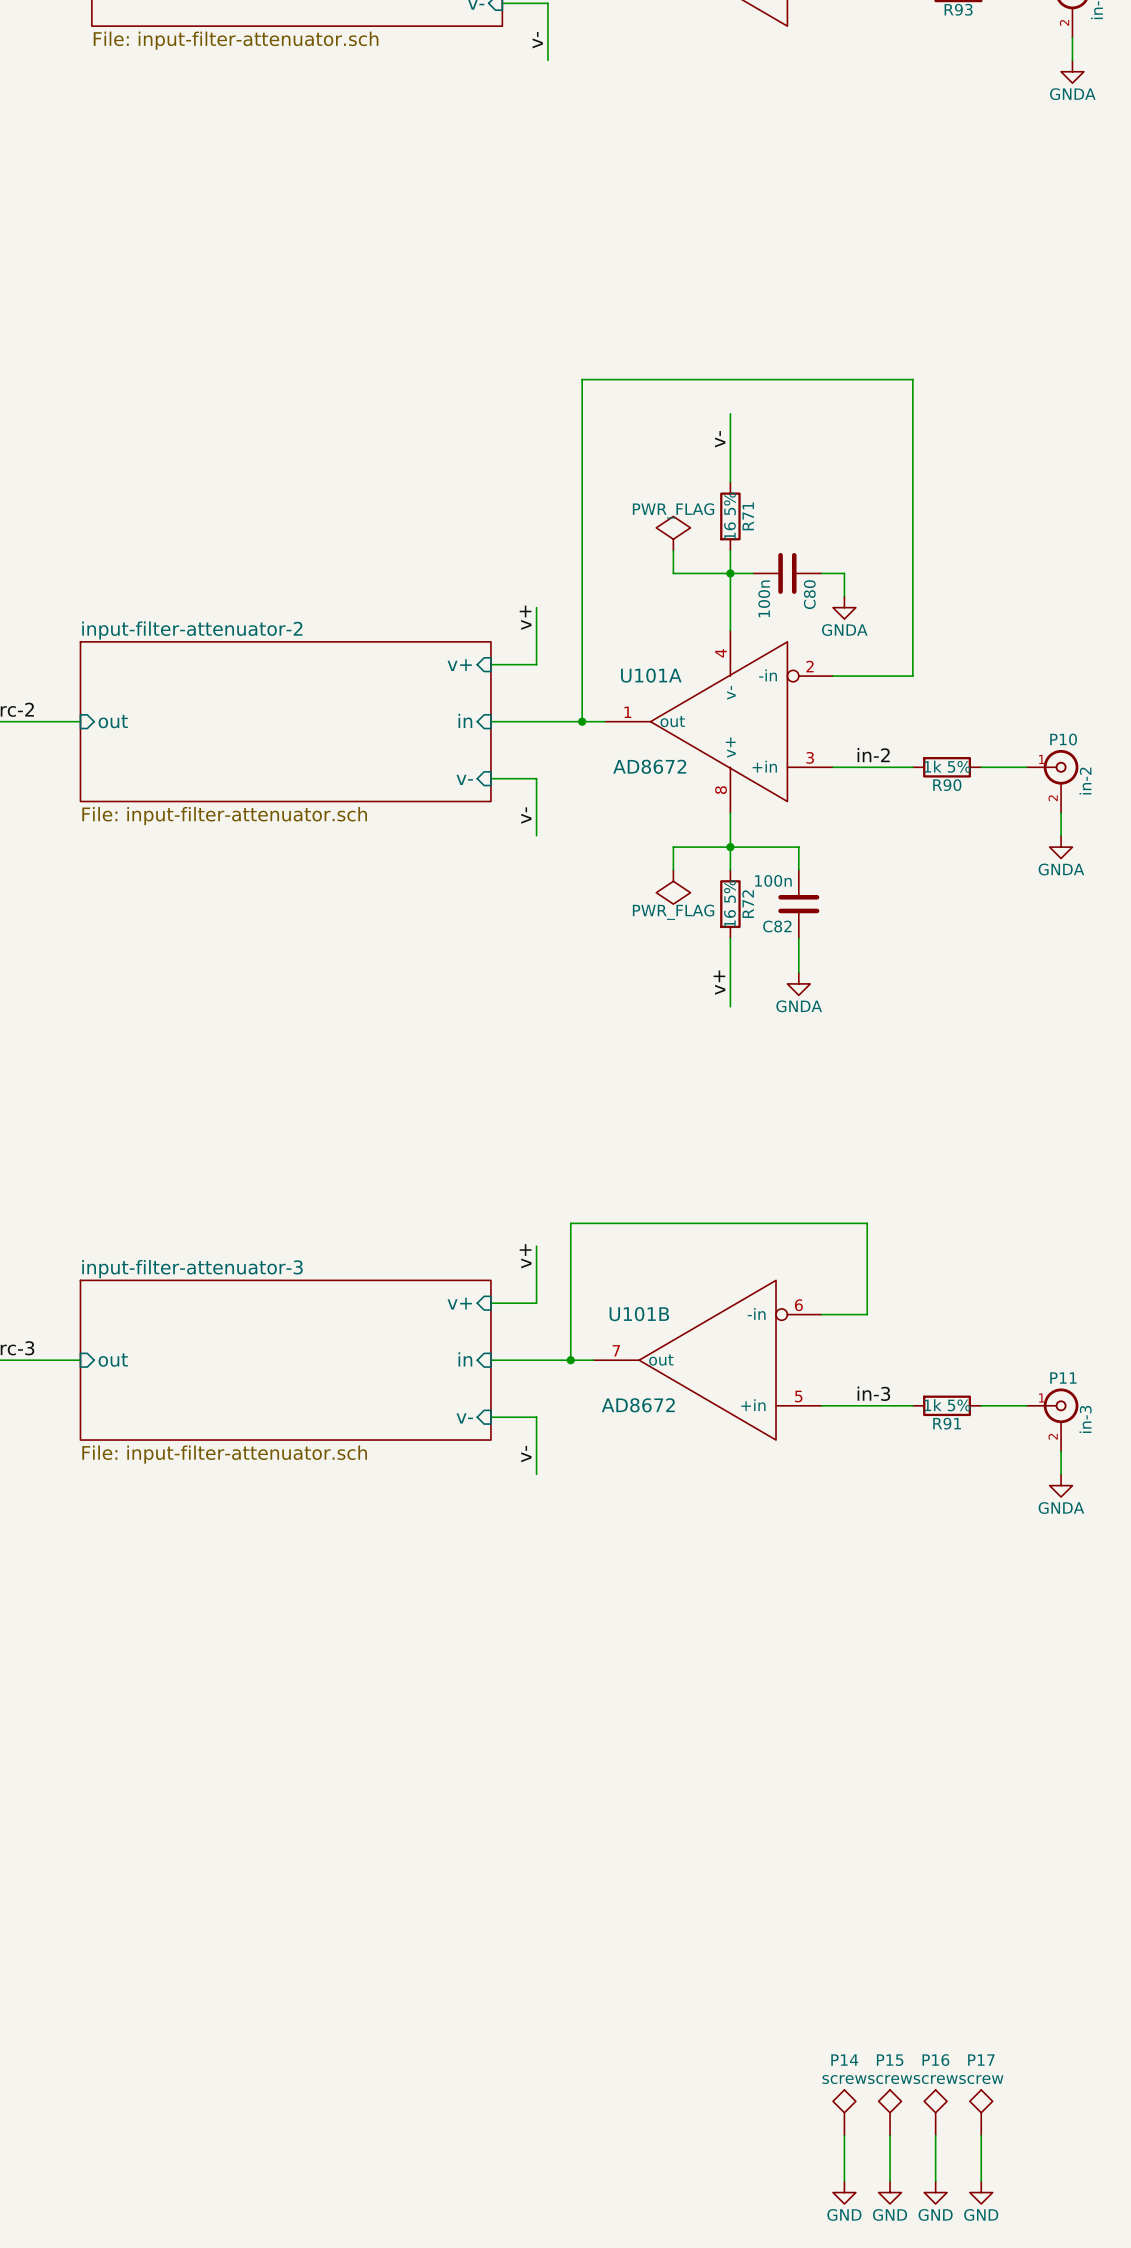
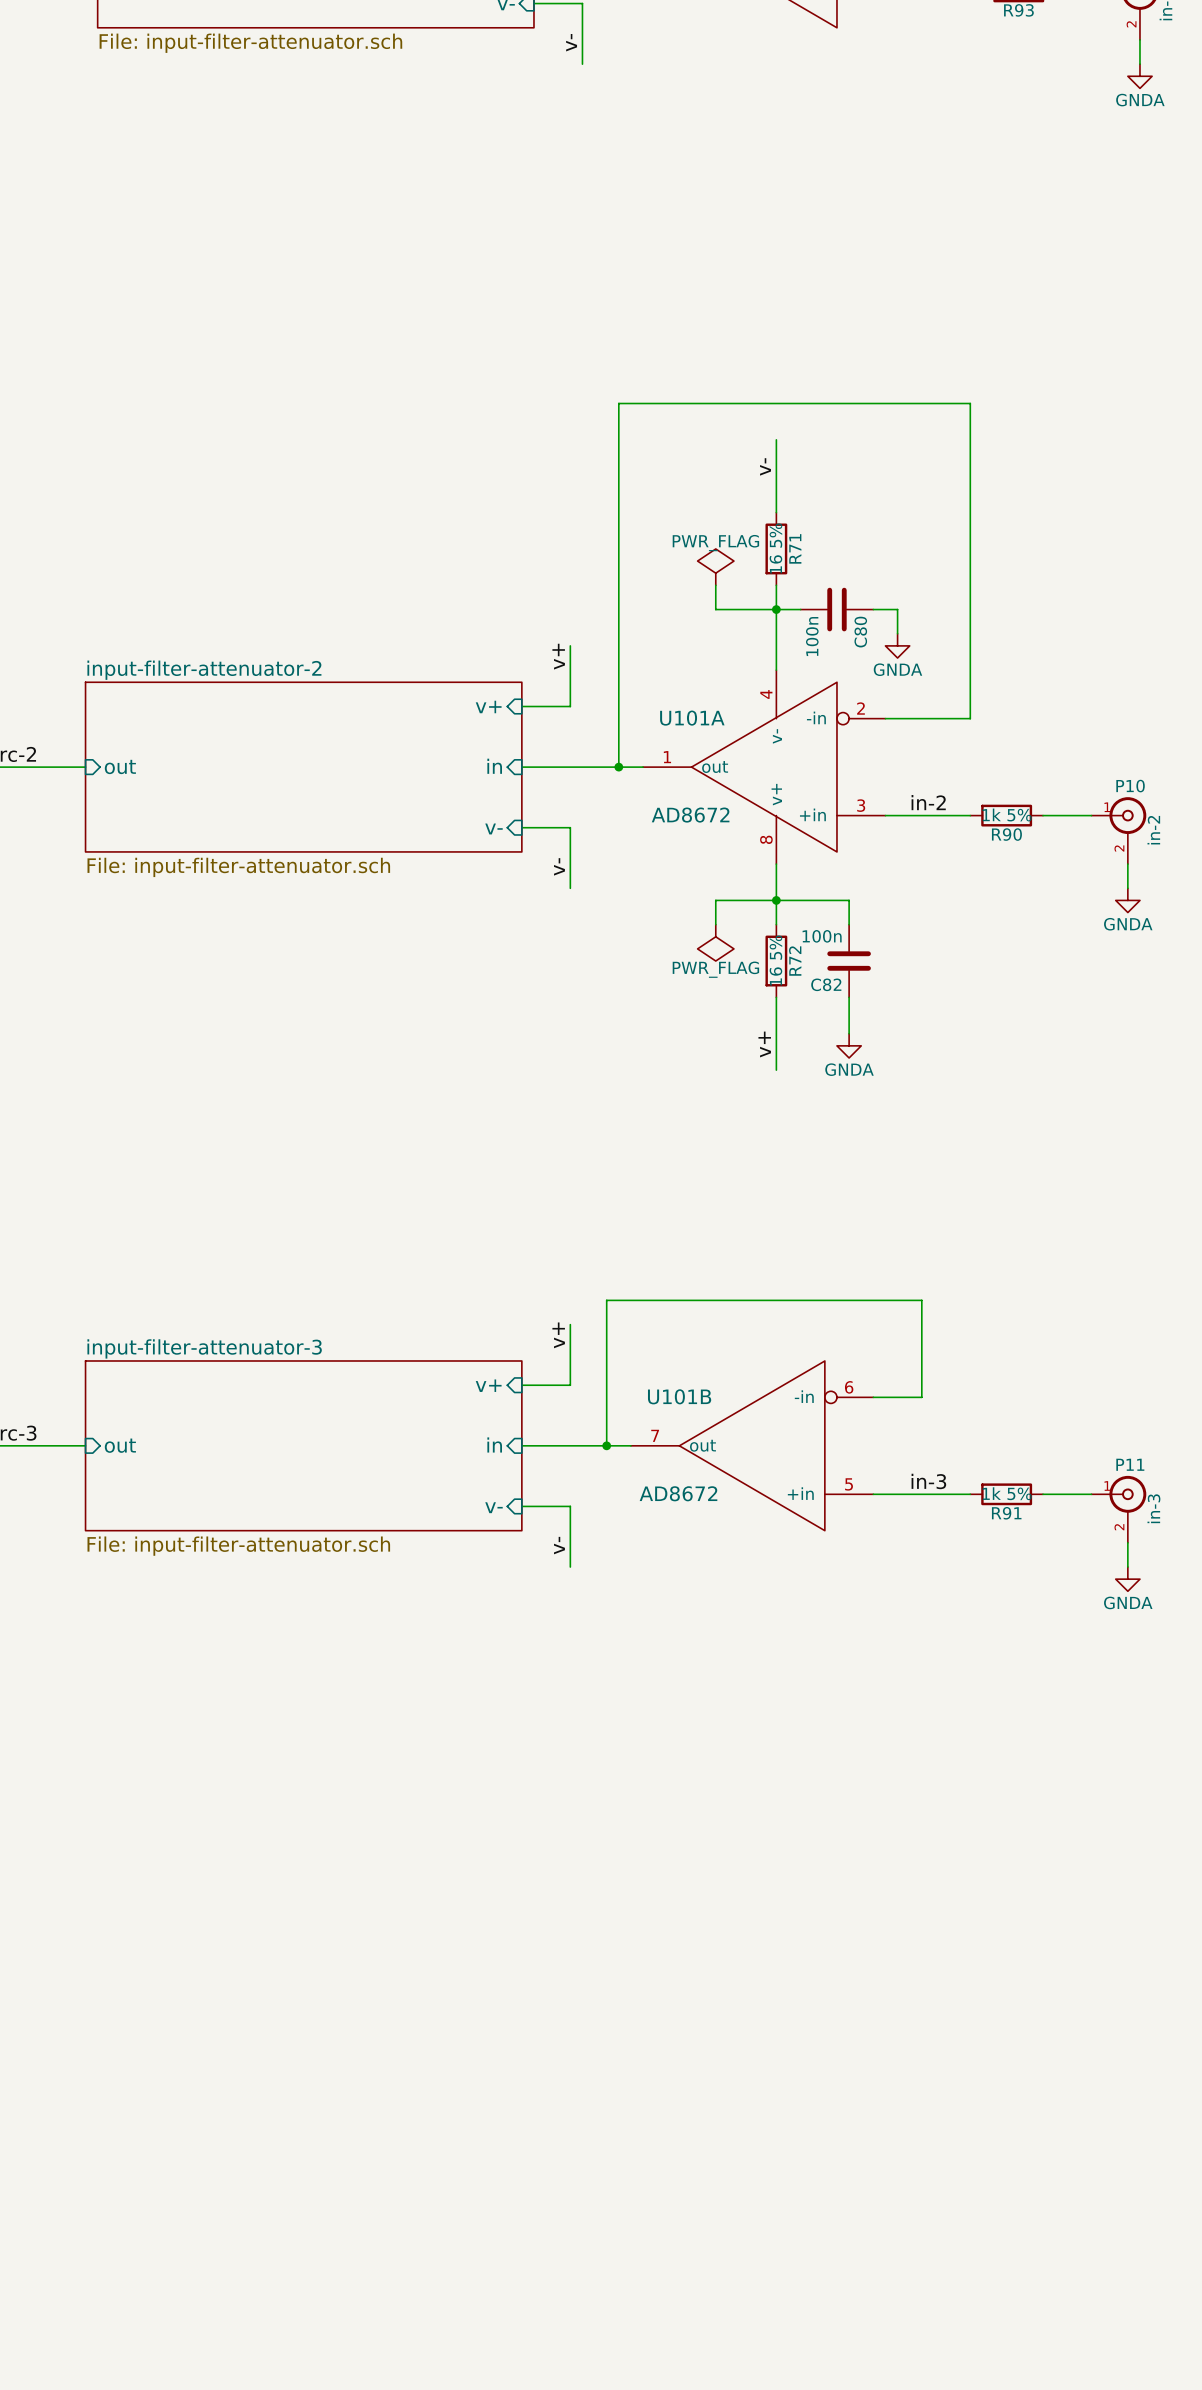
P14: screw (844, 2112) -> none
P15: screw (890, 2112) -> none
P16: screw (935, 2112) -> none
P17: screw (981, 2112) -> none
wire: (844, 2135) (844, 2181) -> none
wire: (890, 2135) (890, 2181) -> none
wire: (935, 2135) (935, 2181) -> none
wire: (981, 2135) (981, 2181) -> none
power symbol: GND (844, 2192) -> none
power symbol: GND (890, 2192) -> none
power symbol: GND (935, 2192) -> none
power symbol: GND (981, 2192) -> none

